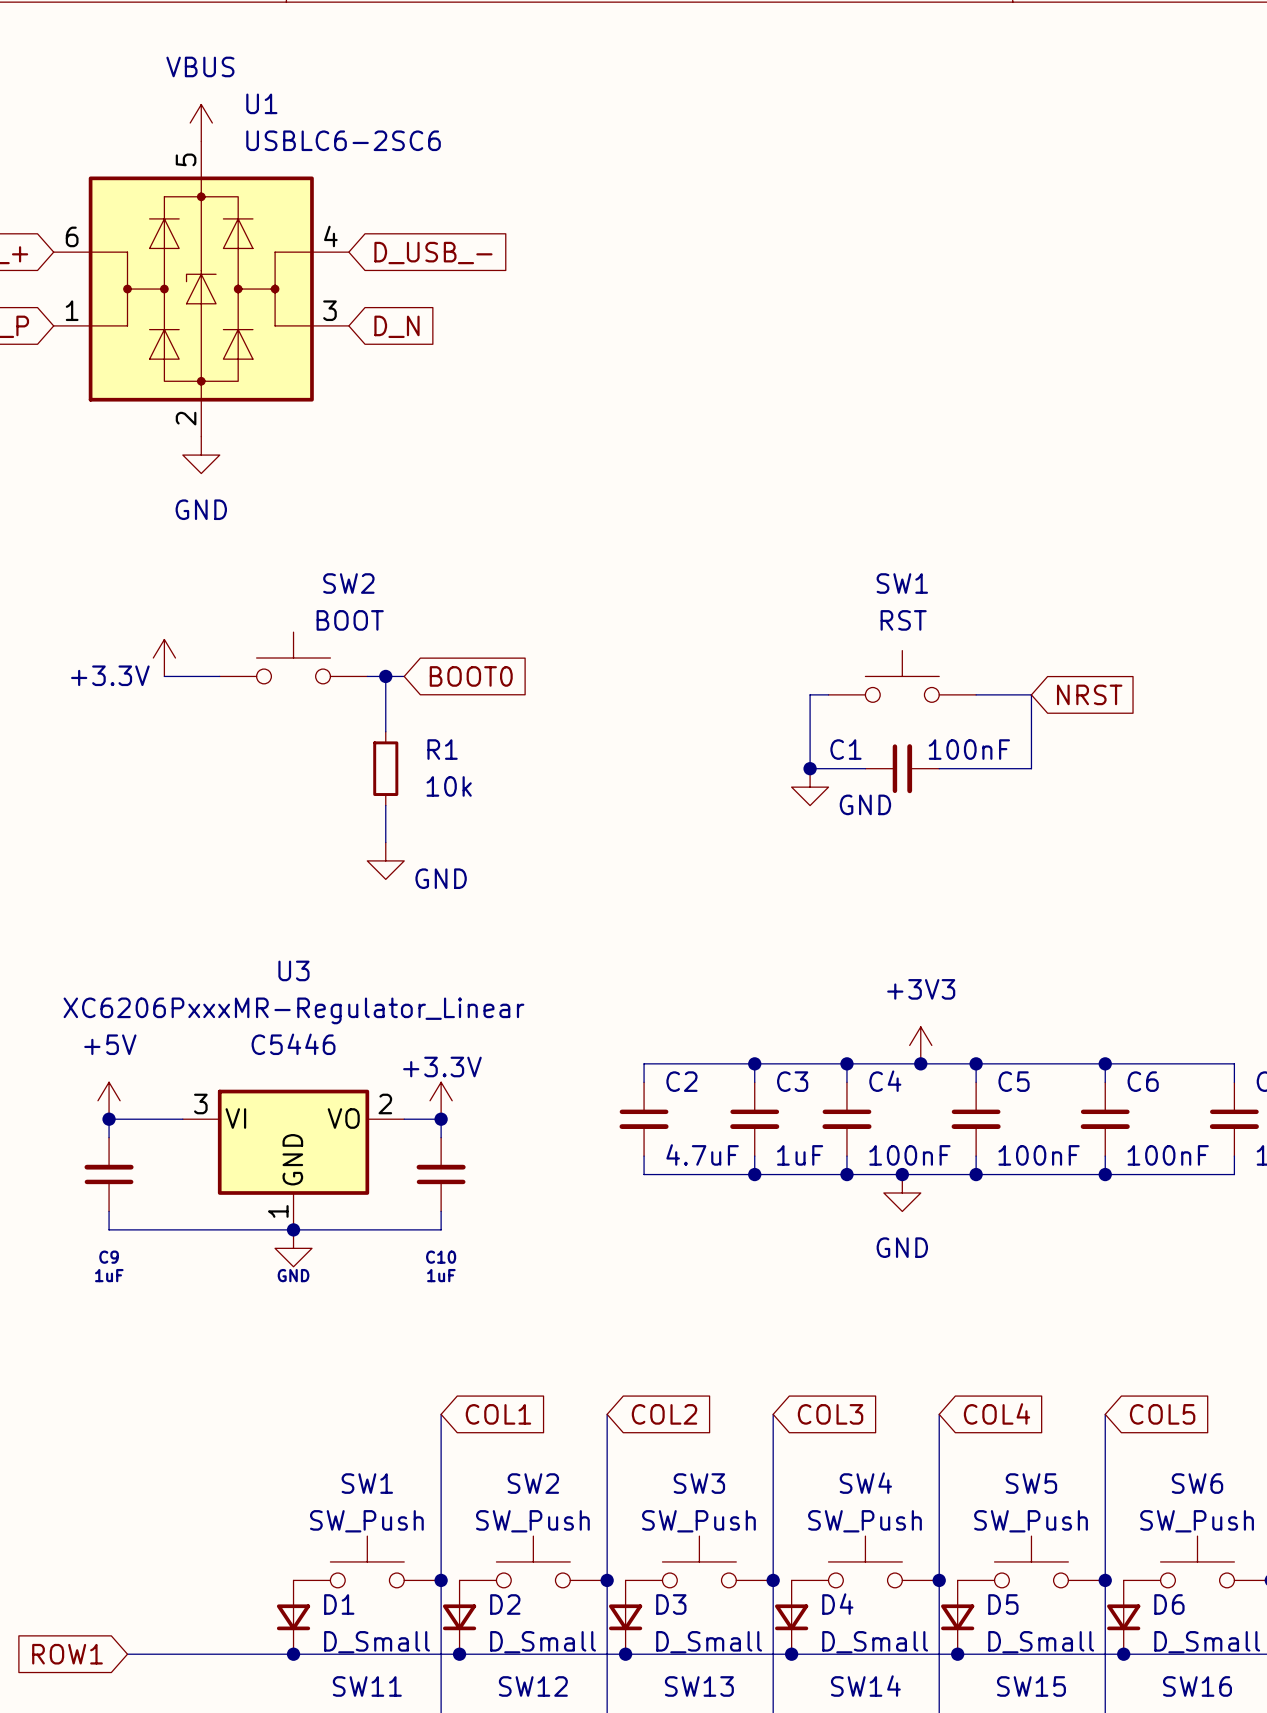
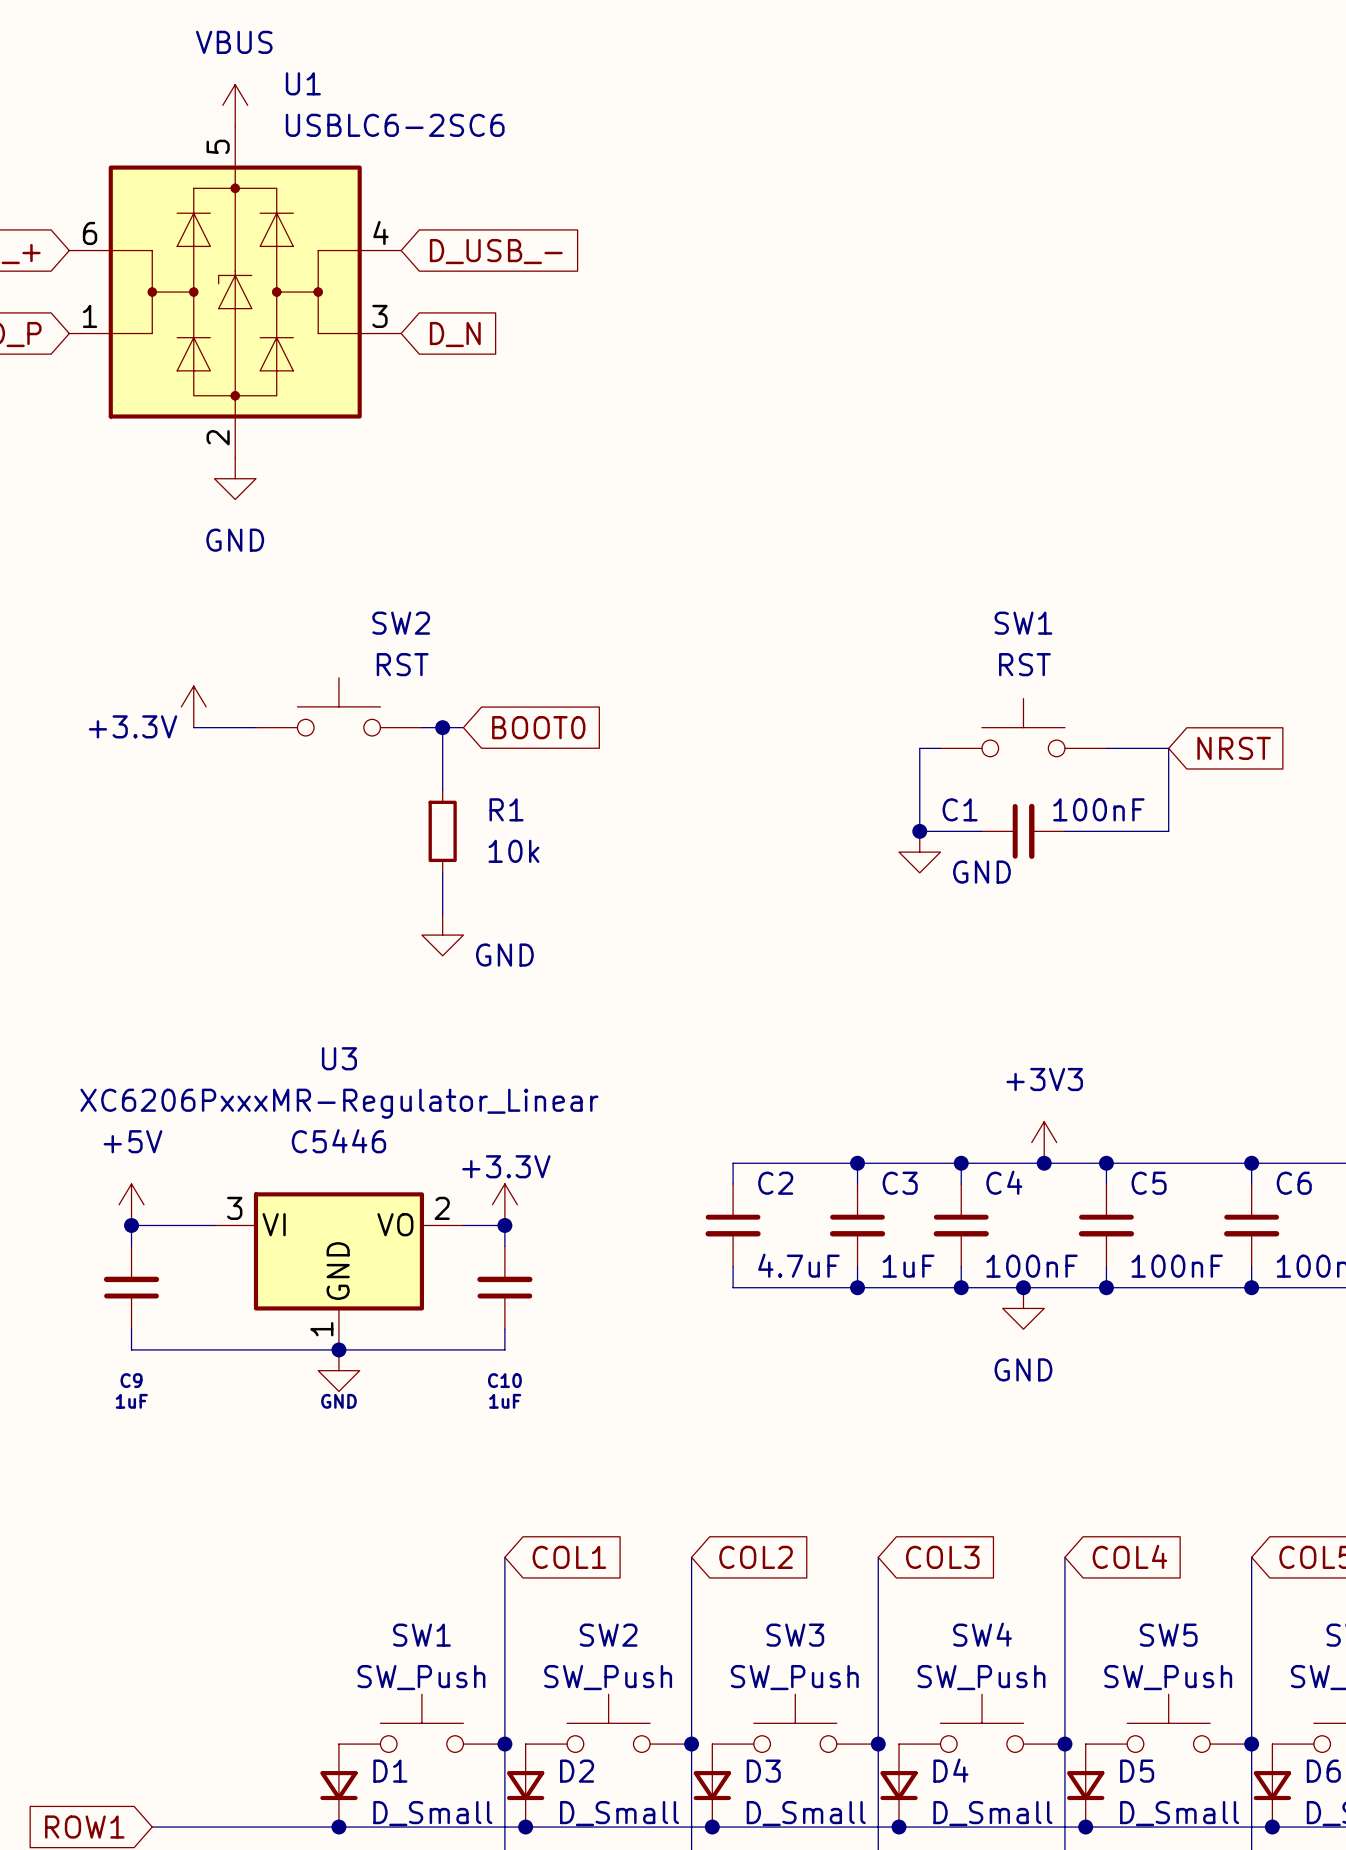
SW2 value: BOOT (350, 620) -> RST (402, 664)

